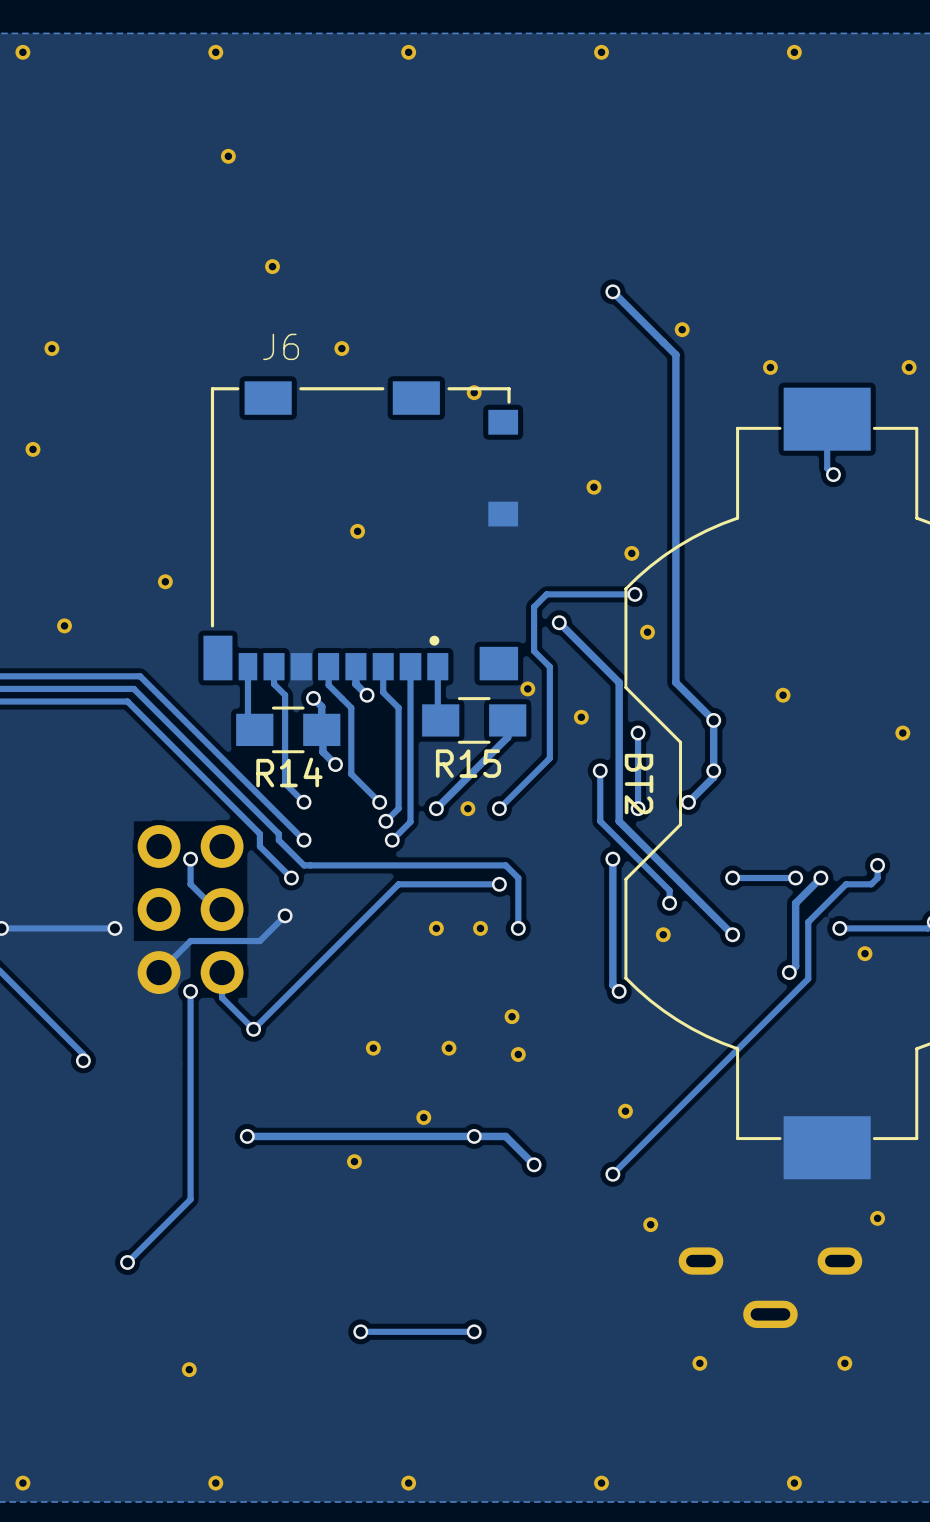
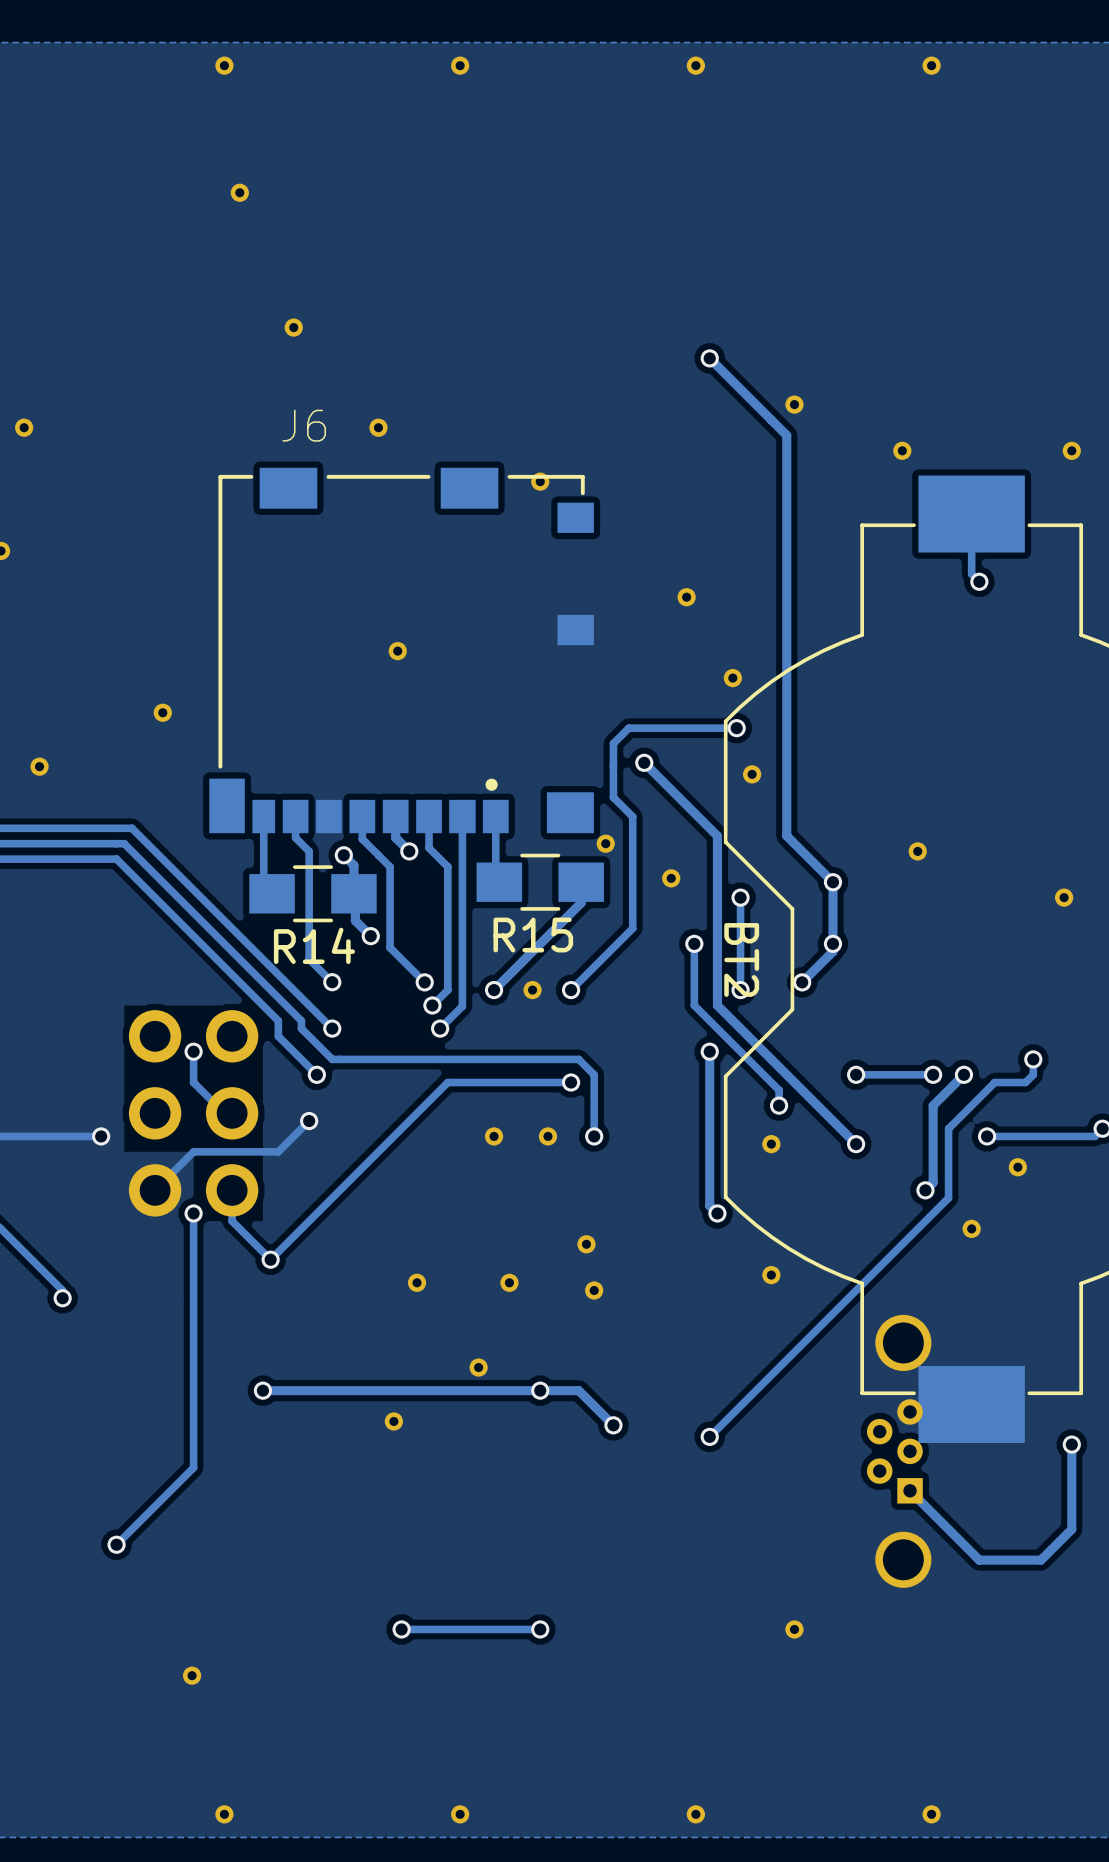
part: none -> (971, 1228)
part position: (625, 1111) -> (771, 1275)
track: none -> (1071, 1444) (1071, 1529) (1040, 1560) (979, 1560) (910, 1490)
via: none -> (1071, 1444)
part: none -> (899, 1451)
part: (877, 1218) -> none
part: (650, 1224) -> none
part: (770, 1287) -> none
part position: (699, 1363) -> (794, 1629)
part: (844, 1363) -> none

